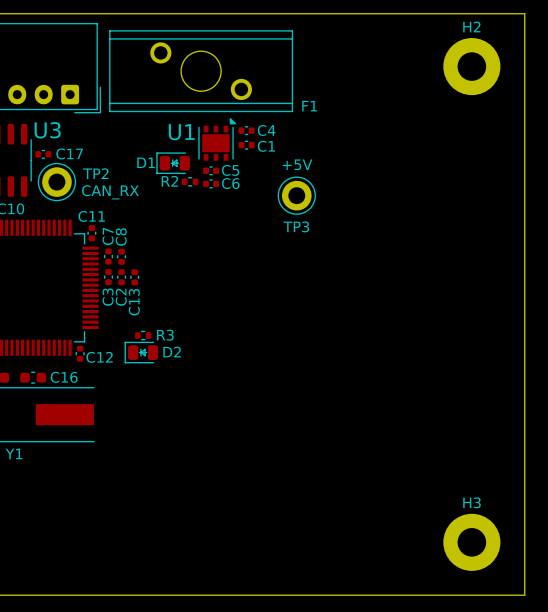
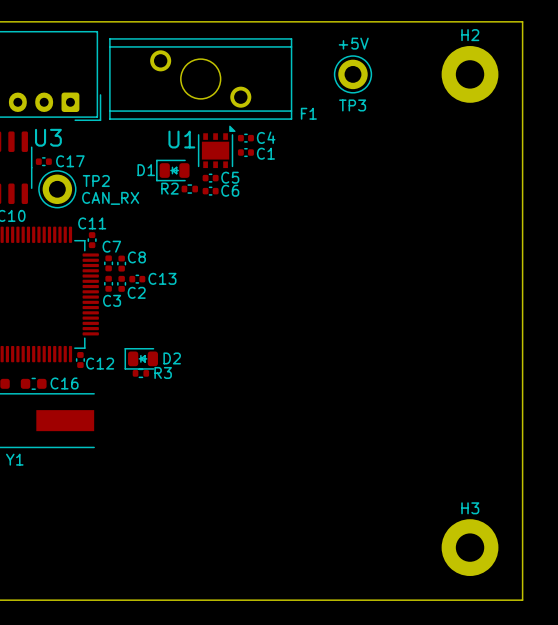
TP3 position: (296, 195) -> (352, 74)
C7 name rotation: 0° (108, 236) -> 90° clockwise (111, 246)
C8 name rotation: 0° (121, 236) -> 90° clockwise (136, 257)
C13 rotation: 0° (134, 277) -> 90° clockwise (137, 279)
C3 name rotation: 0° (108, 297) -> 90° clockwise (112, 300)
C2 name rotation: 0° (121, 297) -> 90° clockwise (136, 292)
C13 name position: C13 (134, 302) -> C13 (162, 278)
R3 position: (143, 335) -> (140, 373)

